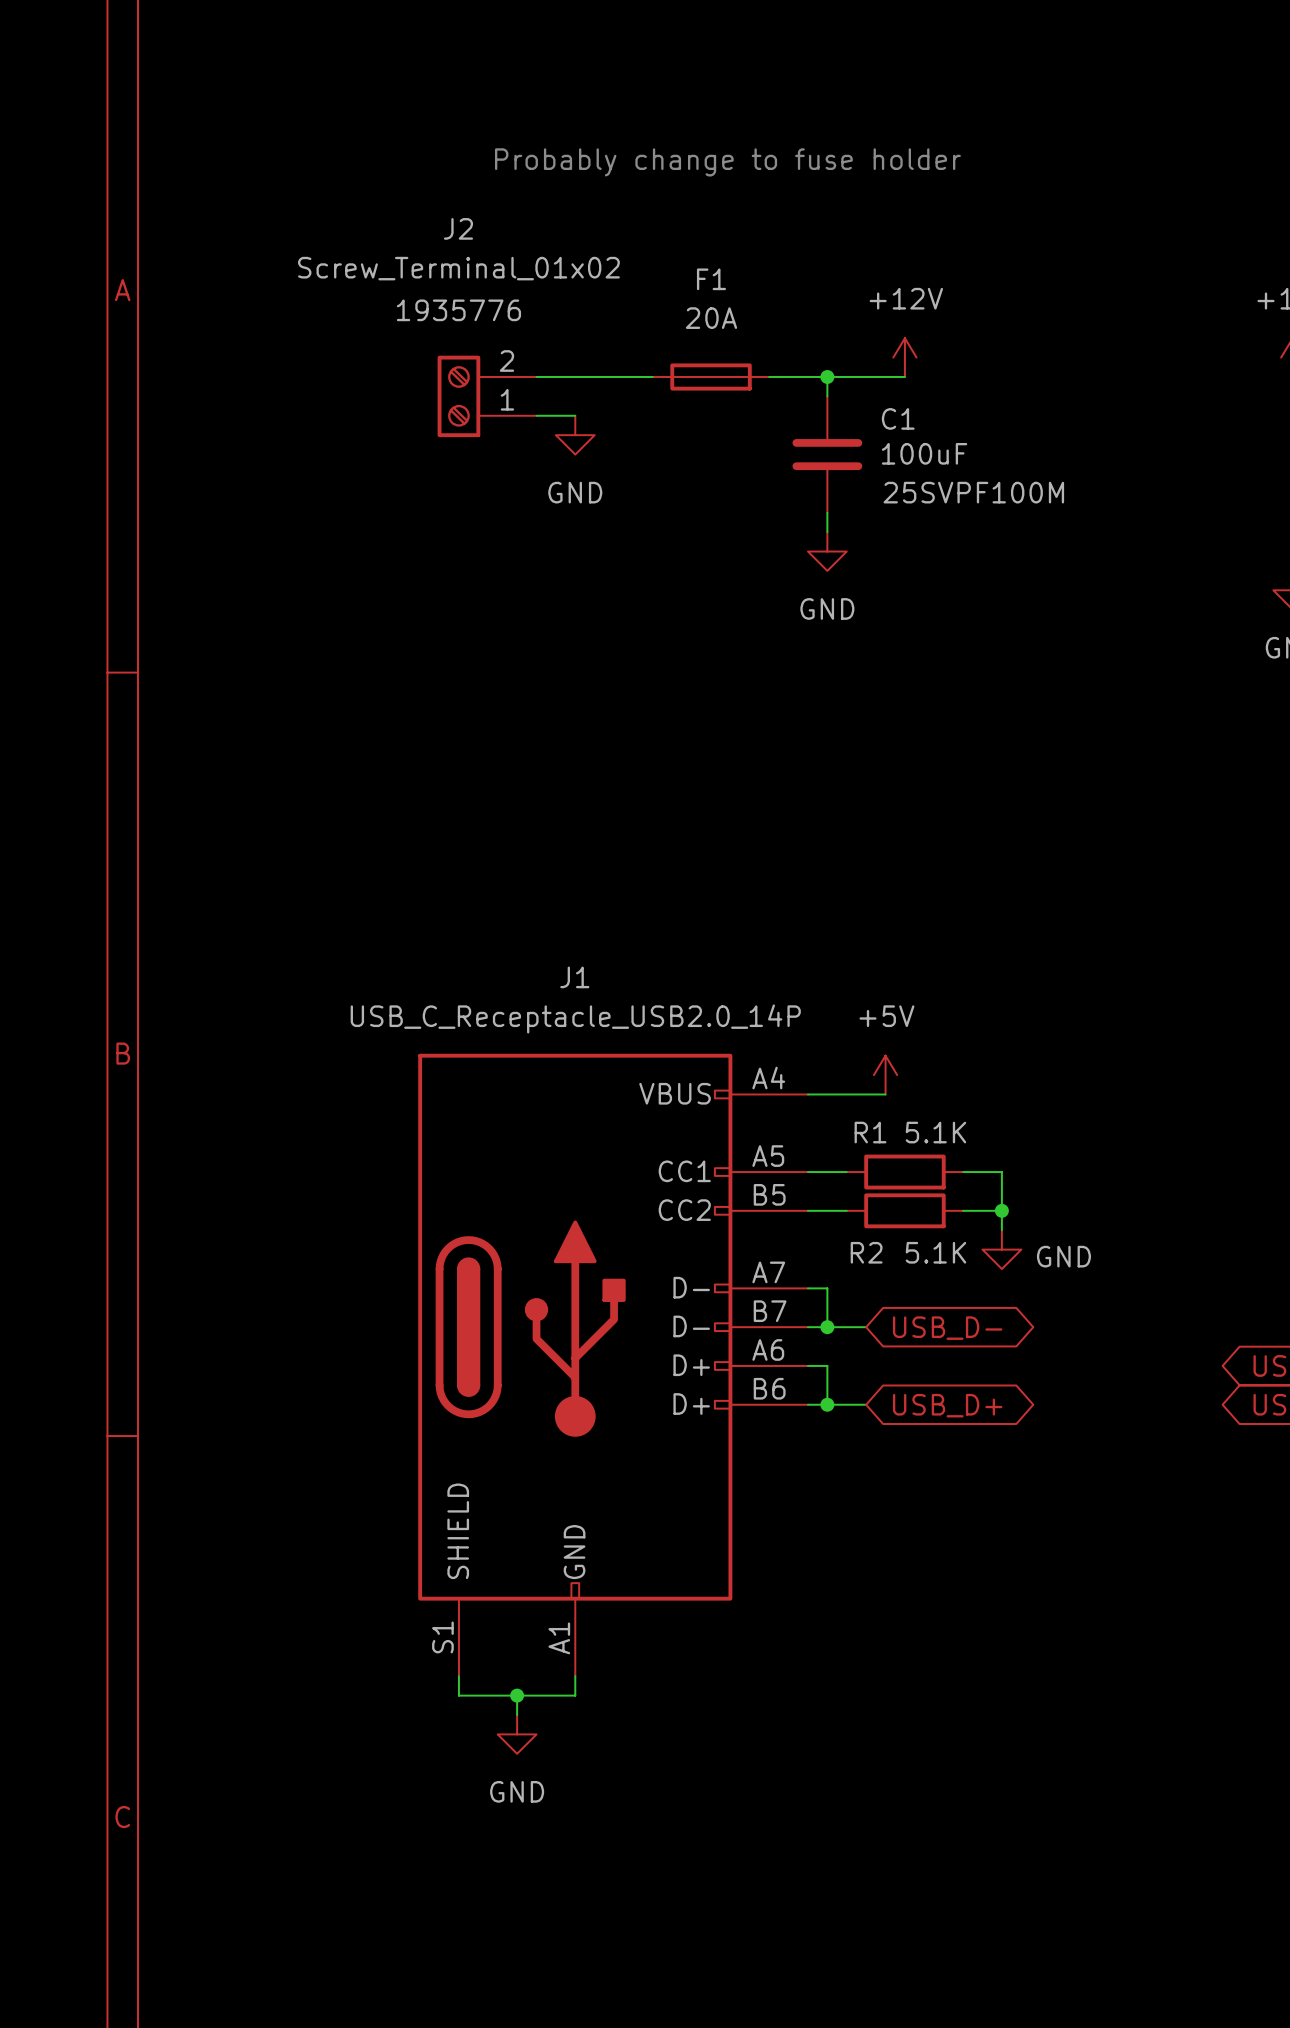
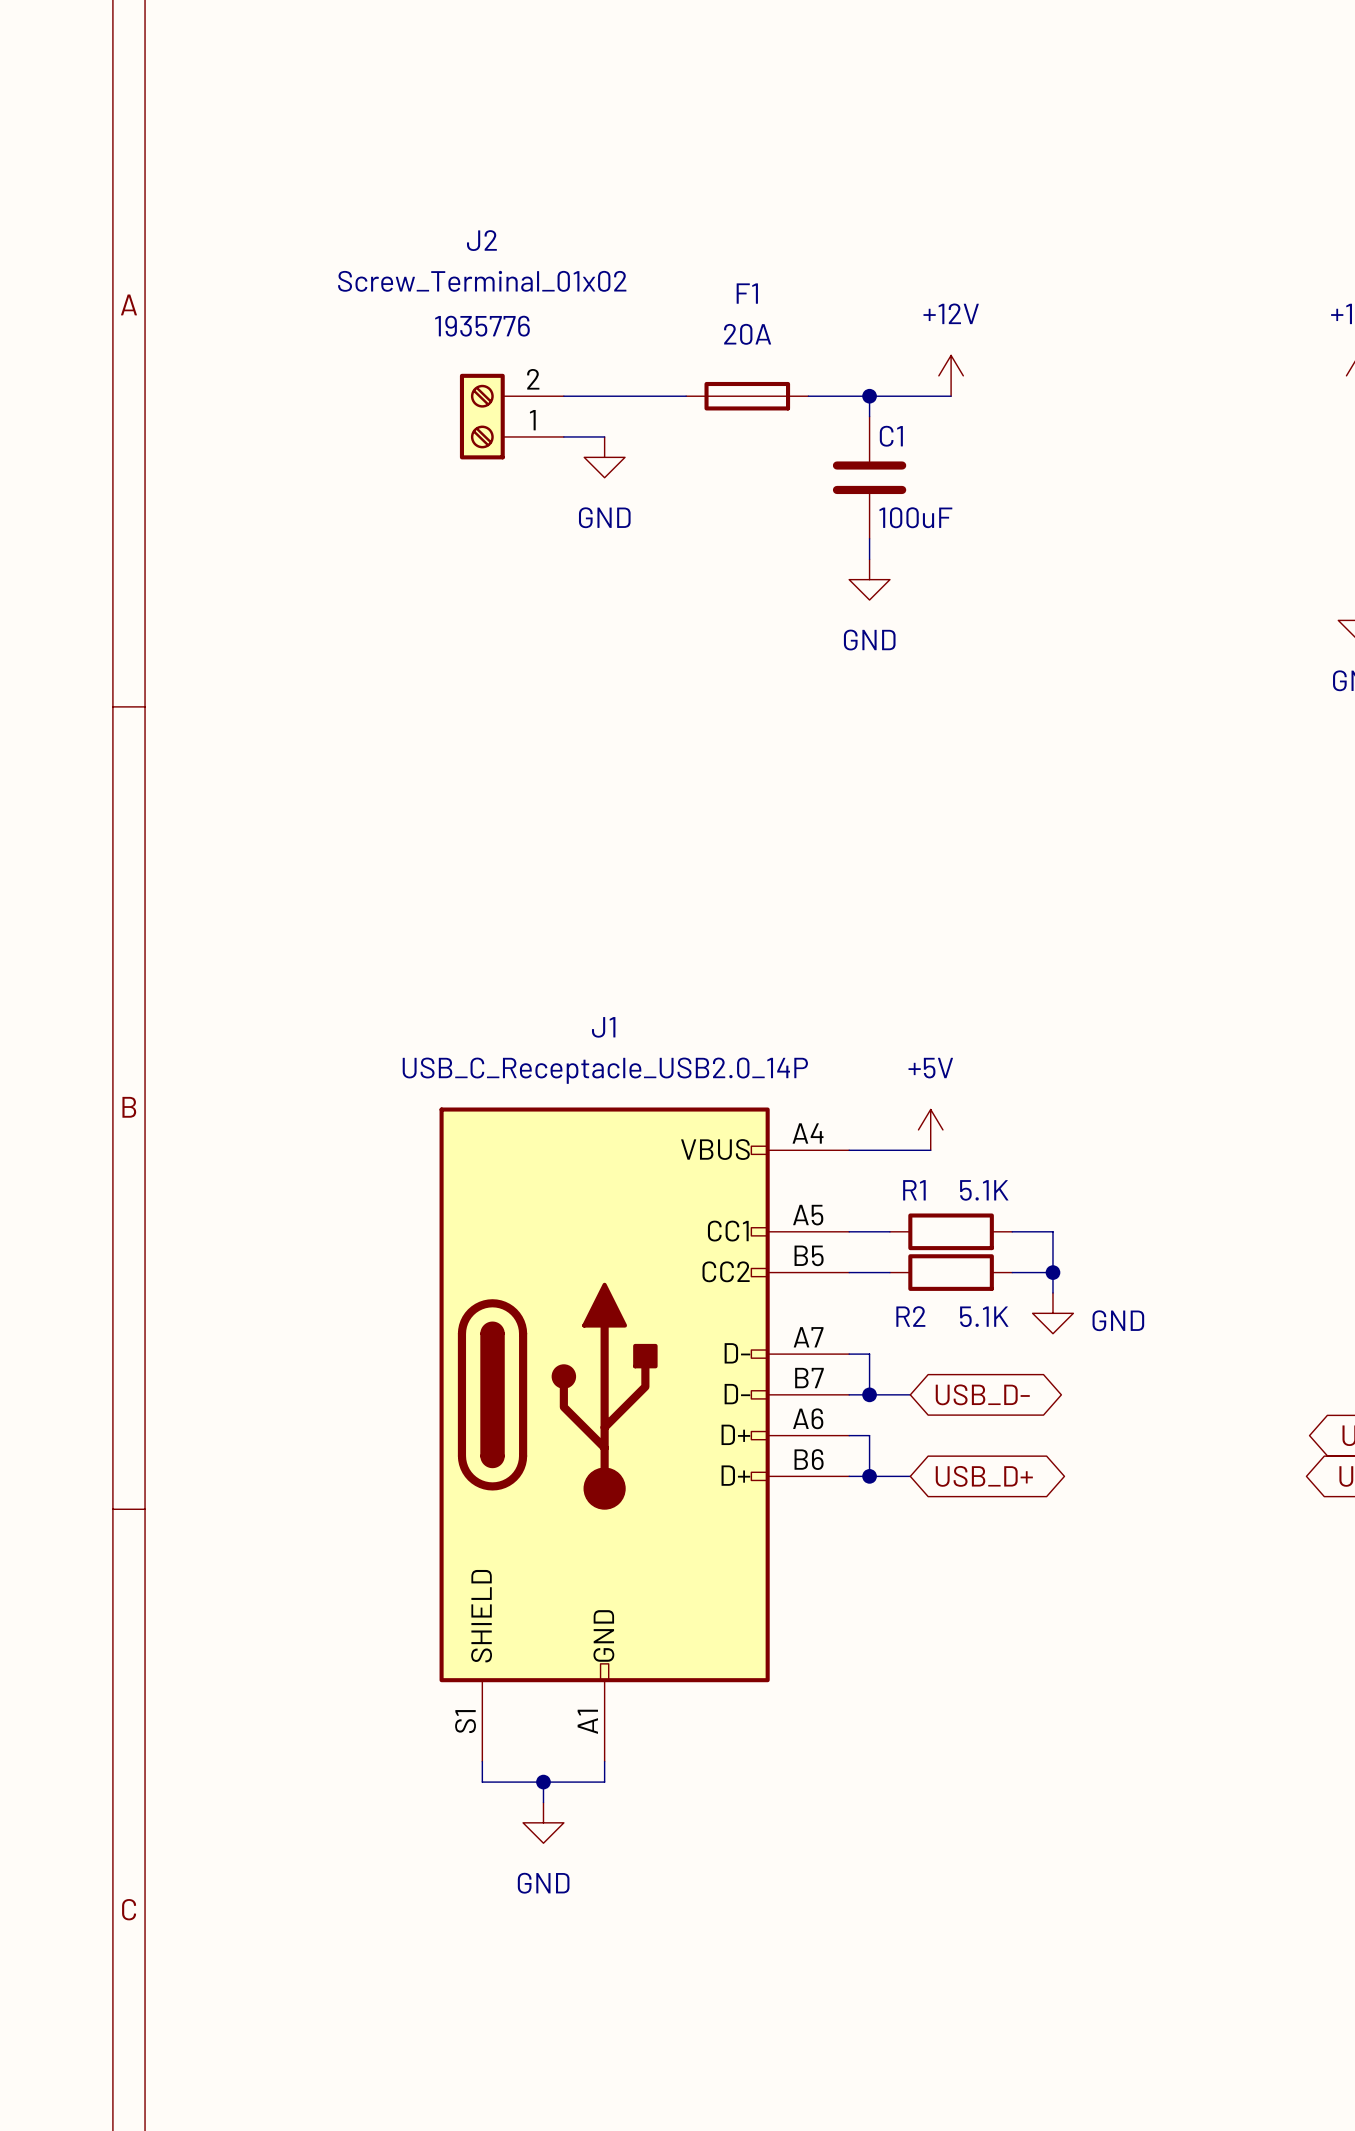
text: Probably change to fuse holder (727, 162) -> none
C1 name position: C1 (898, 418) -> C1 (891, 436)
C1 value position: 100uF (924, 453) -> 100uF (915, 517)
C1 text: 25SVPF100M (973, 492) -> none

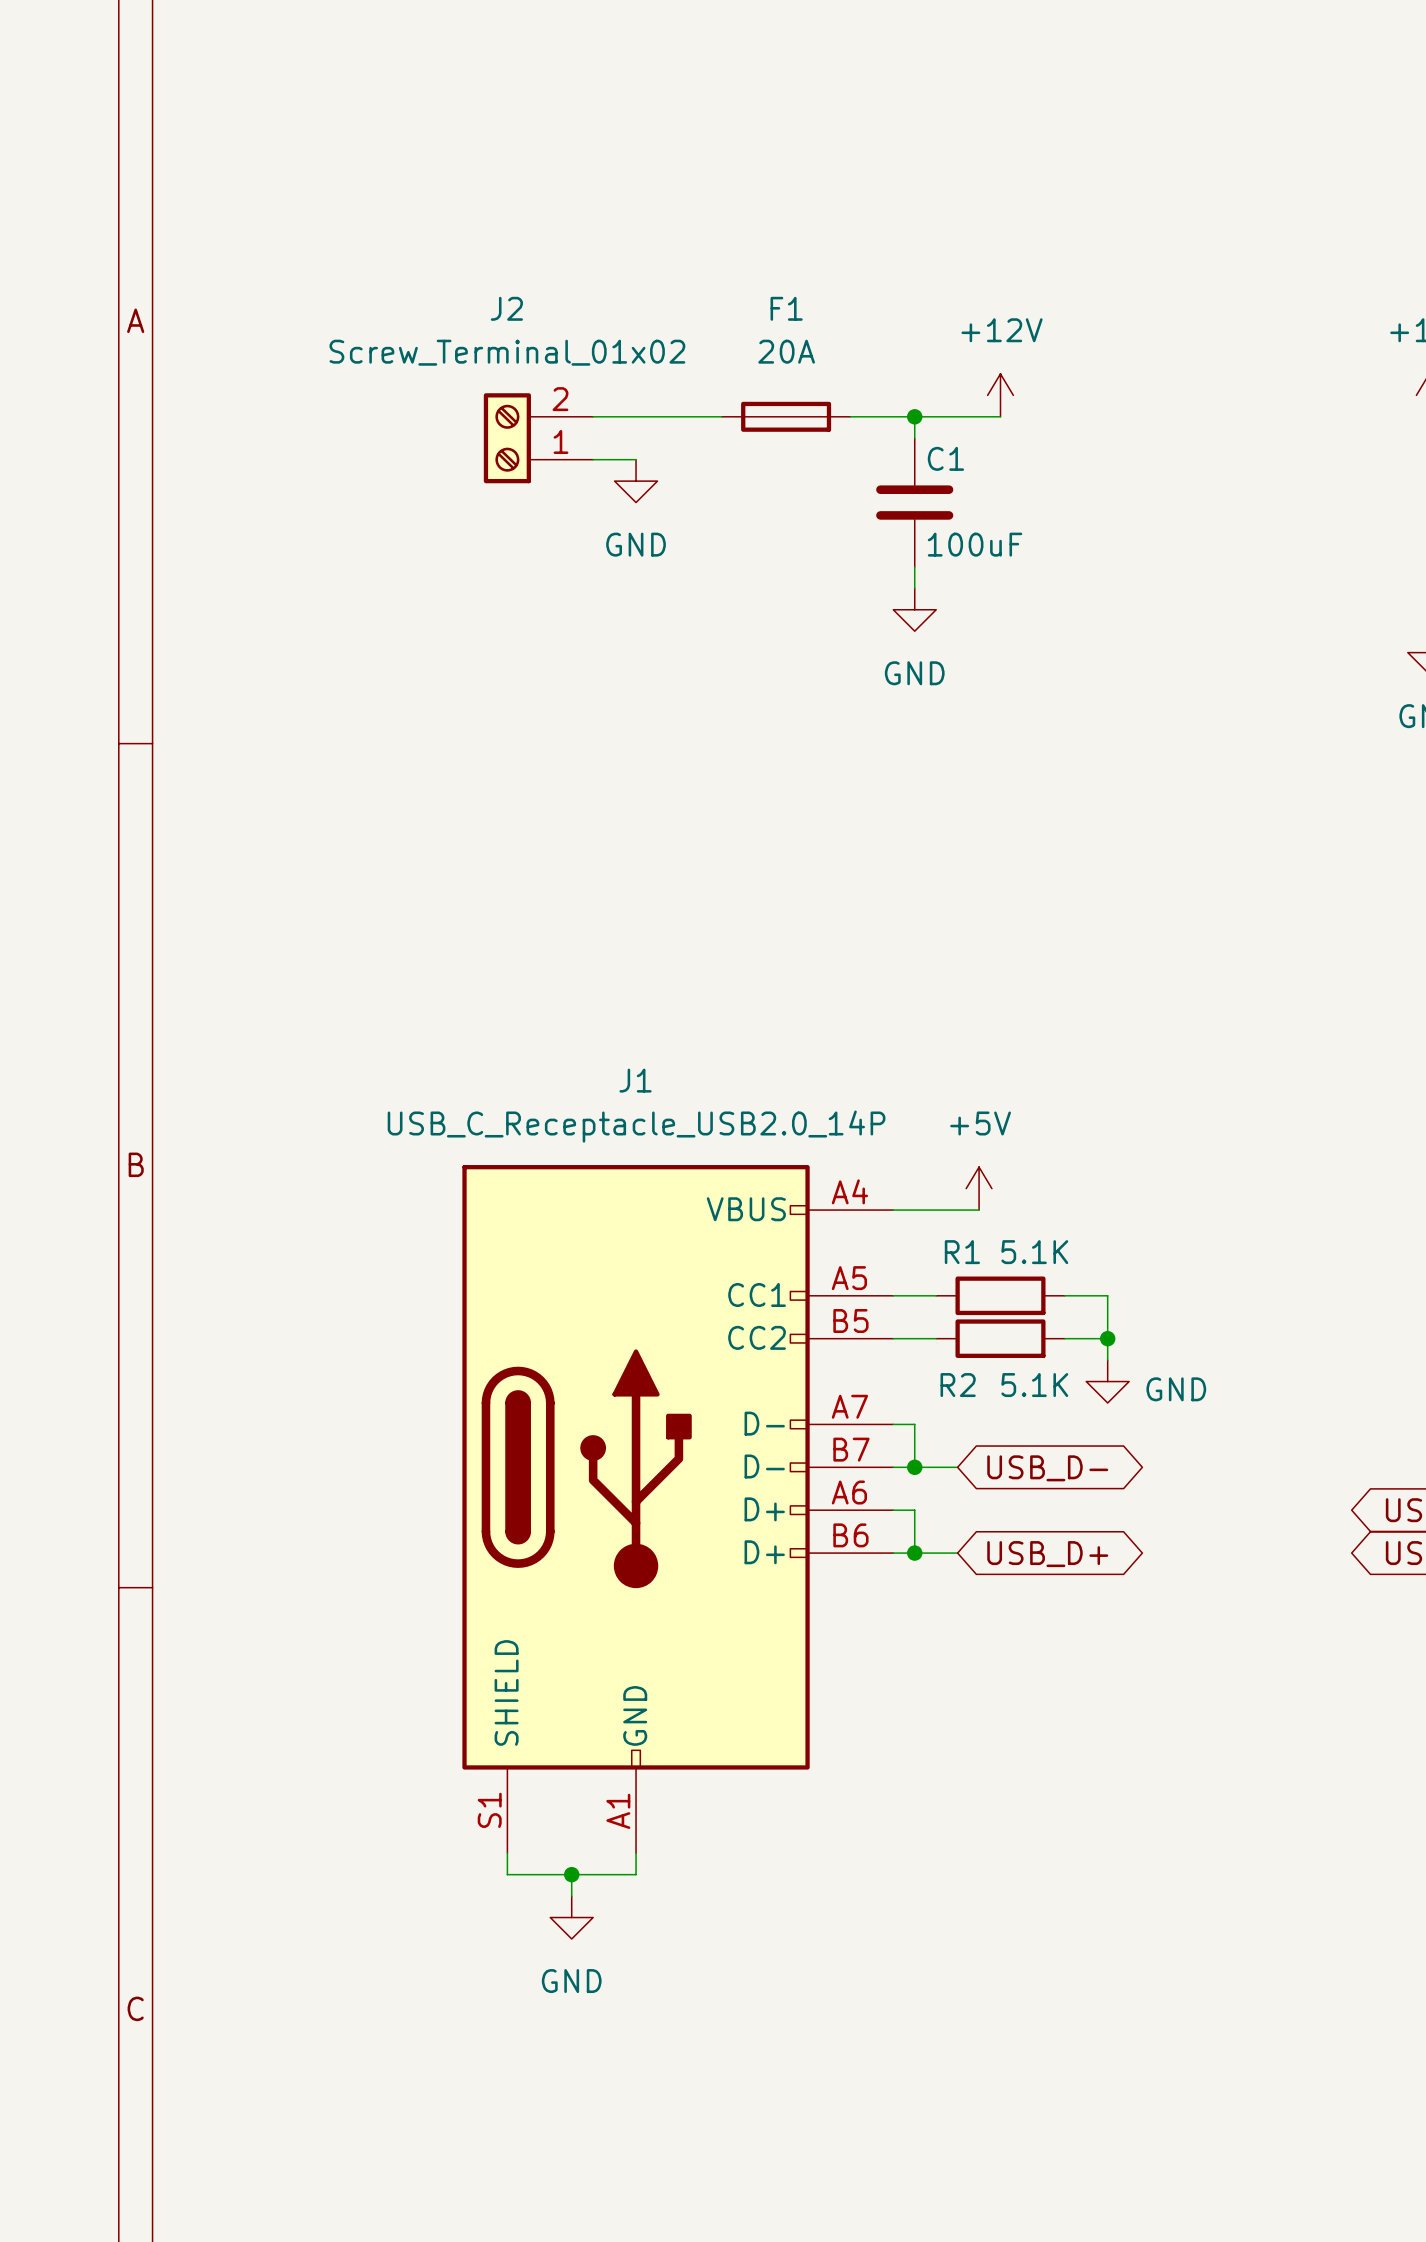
J2 name position: J2 (481, 240) -> J2 (506, 308)
J2 value position: Screw_Terminal_01x02 (482, 281) -> Screw_Terminal_01x02 (507, 352)
J2 text: 1935776 (482, 326) -> none

